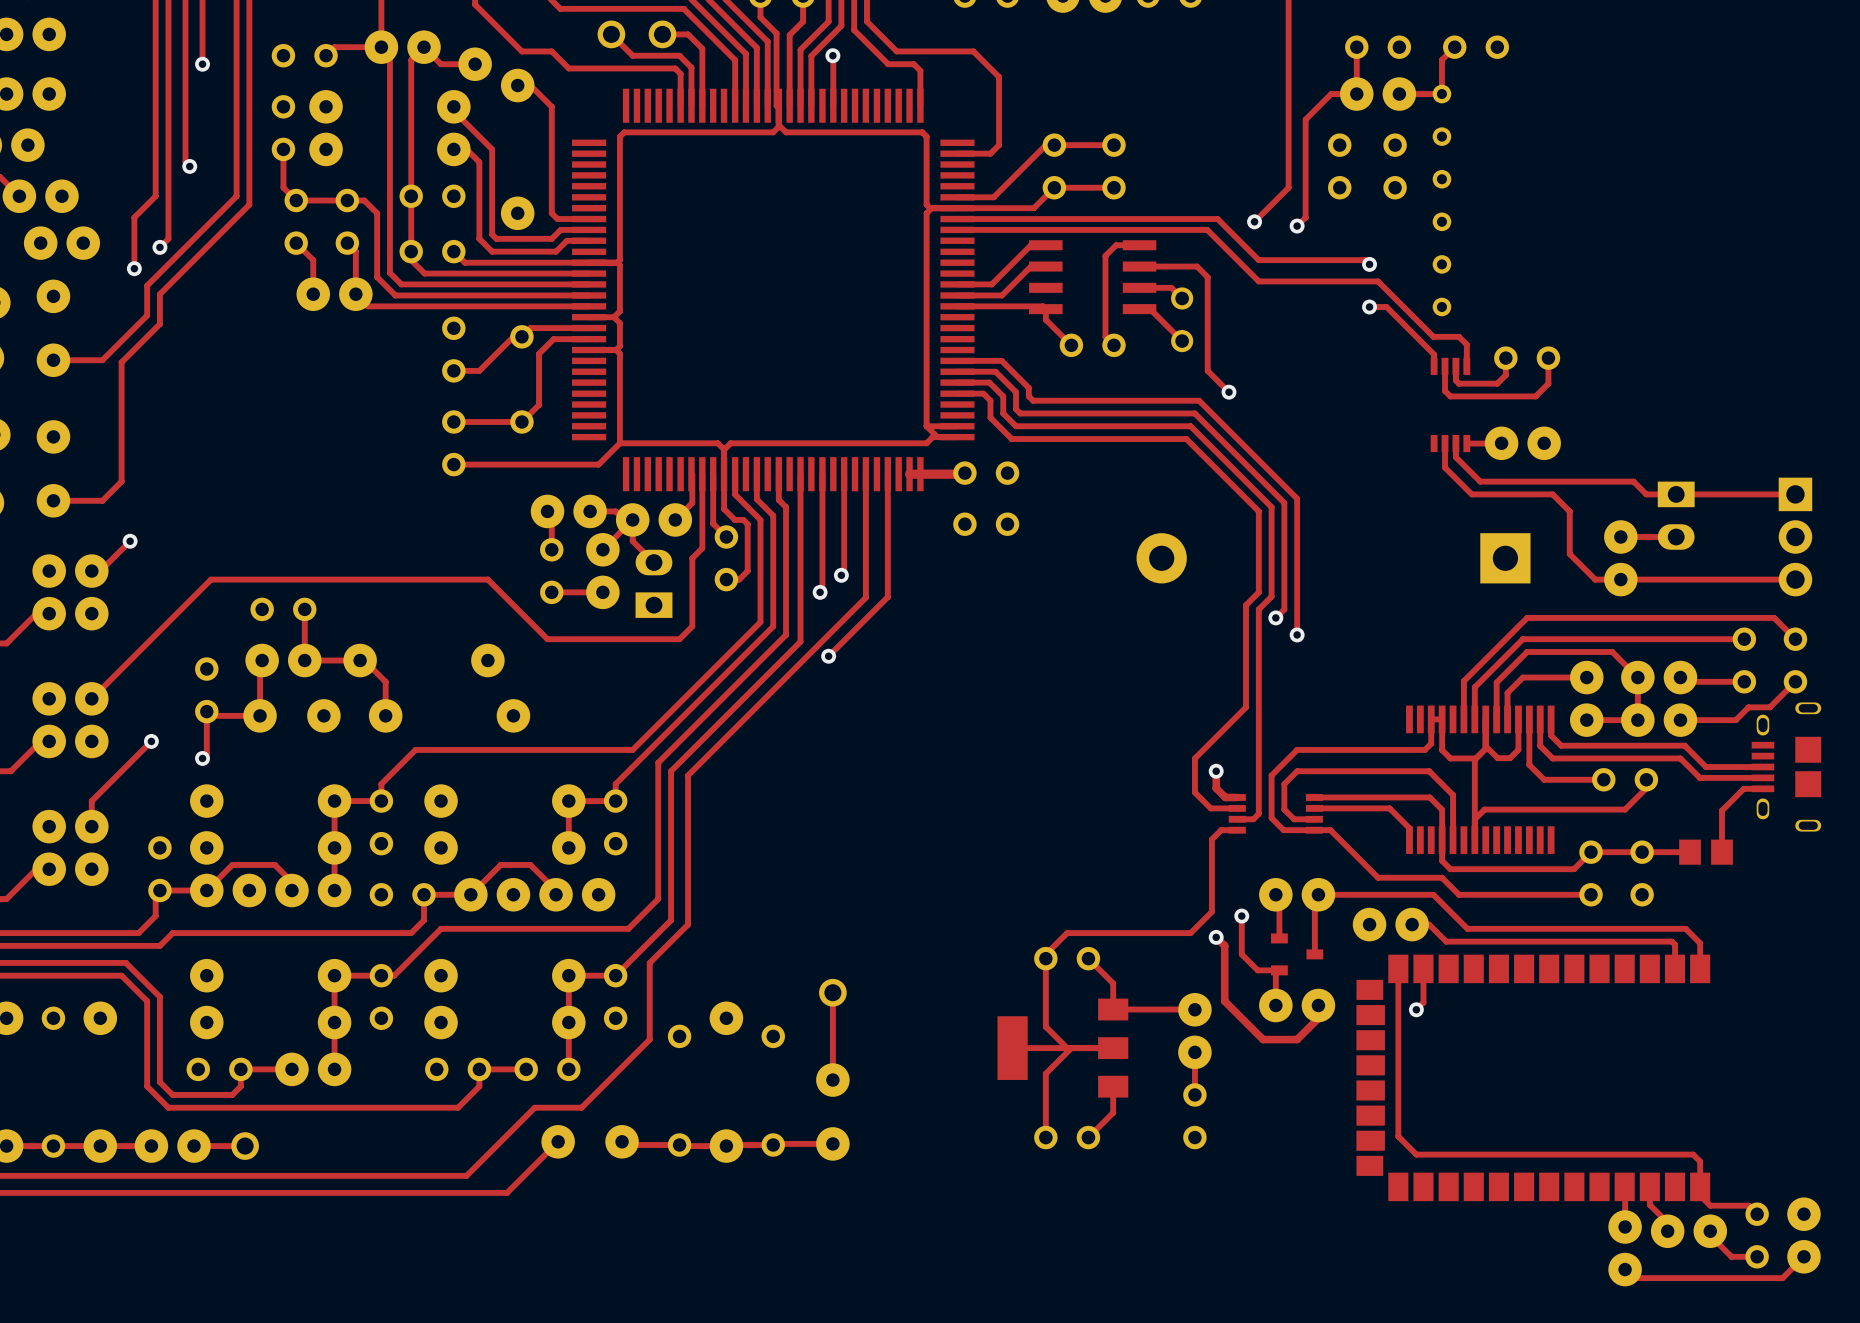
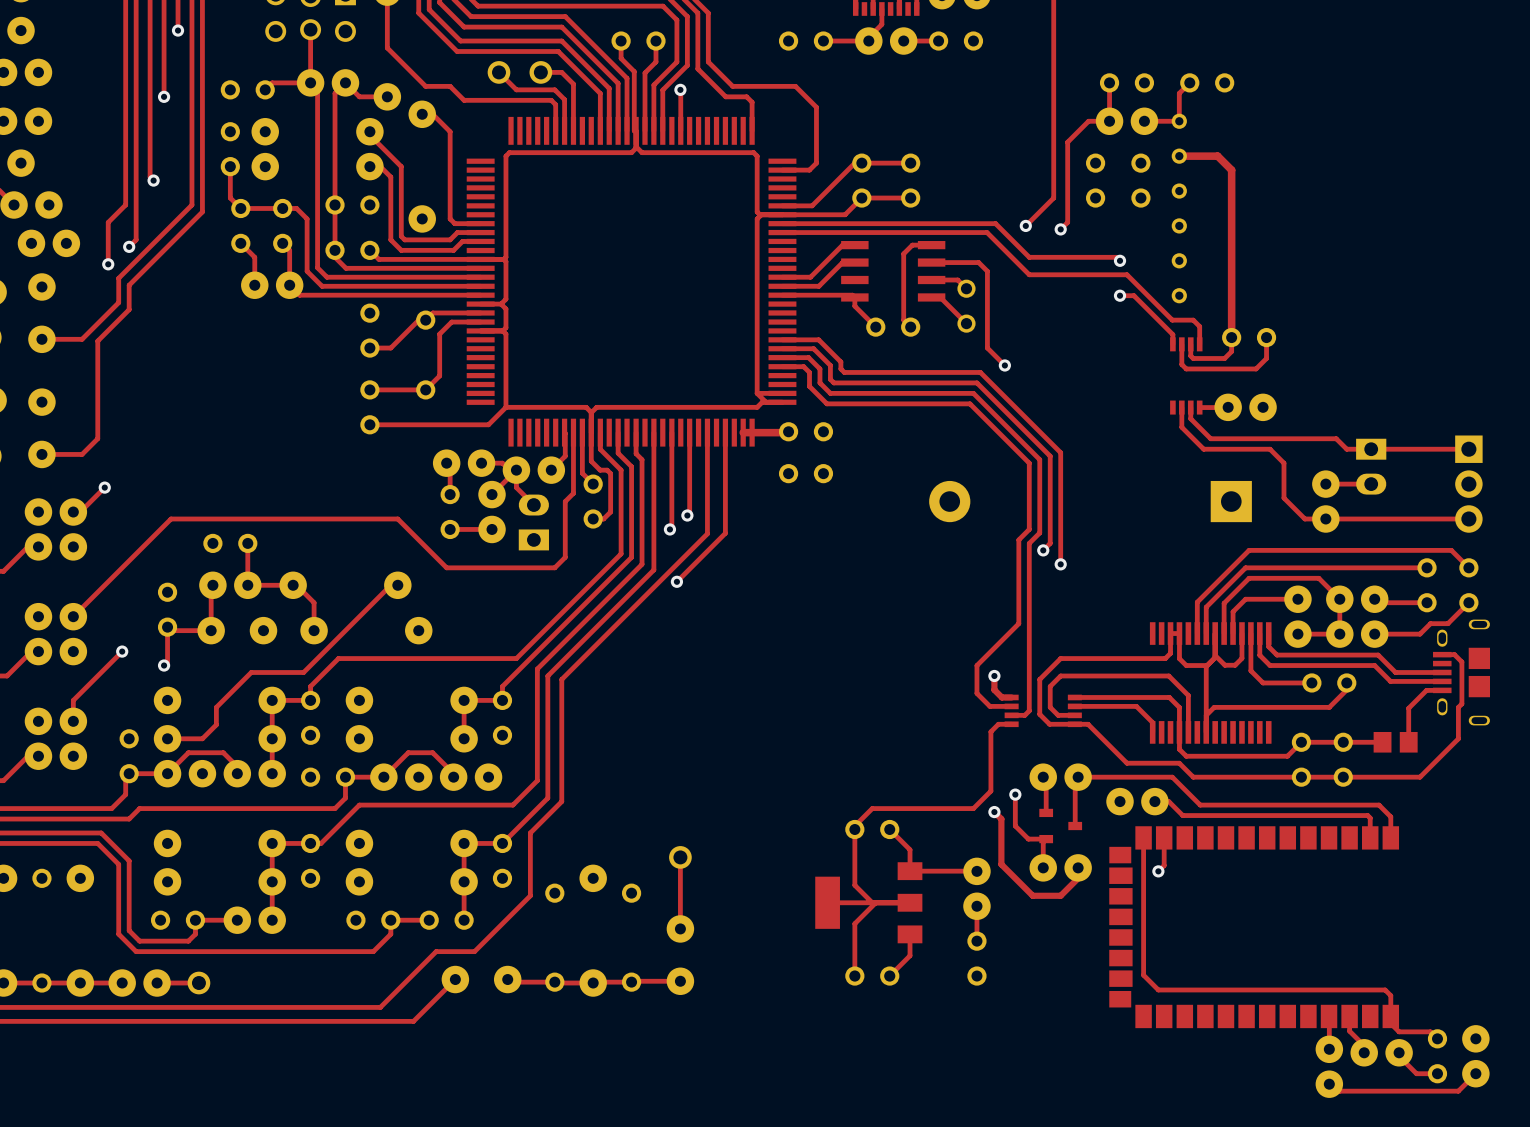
track: none -> (1179, 156) (1217, 156) (1231, 170) (1231, 337)
track: none -> (397, 585) (390, 585) (303, 672) (251, 672) (216, 707) (216, 724) (202, 738) (167, 738)
track: none -> (1442, 654) (1454, 654) (1461, 662) (1461, 703) (1458, 707) (1458, 738) (1420, 777) (1301, 777)

